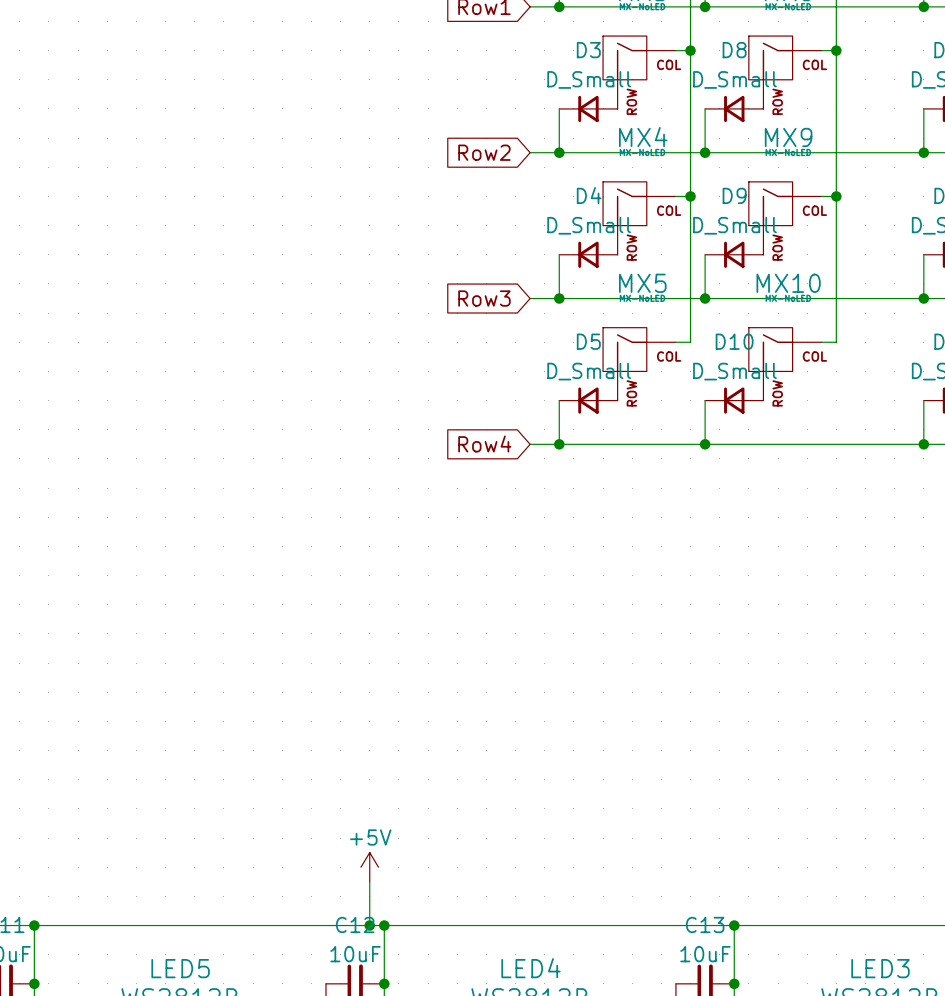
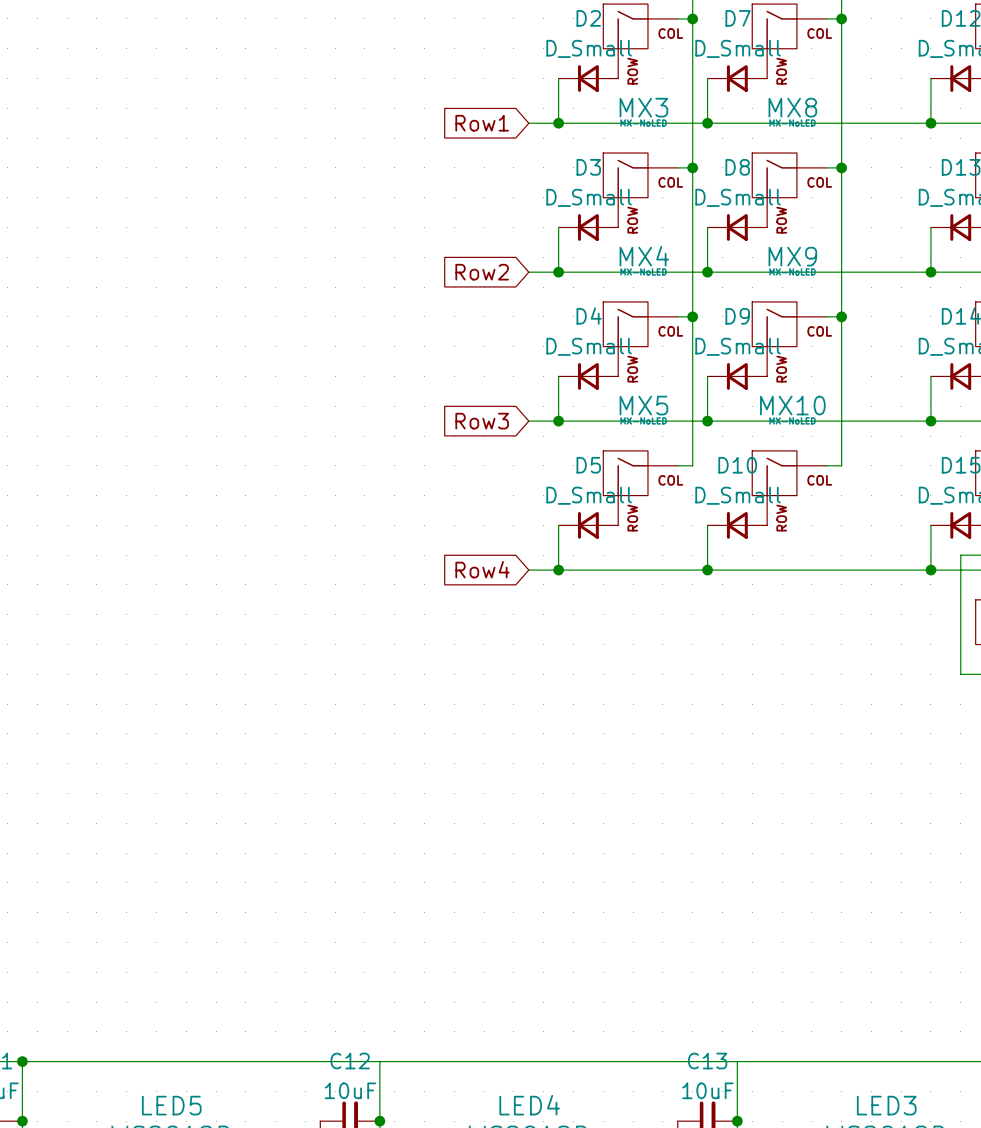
power symbol: +5V (369, 867) -> none
wire: (369, 881) (369, 925) -> none
junction: (369, 925) -> none
junction: (384, 925) -> none
junction: (734, 925) -> none

